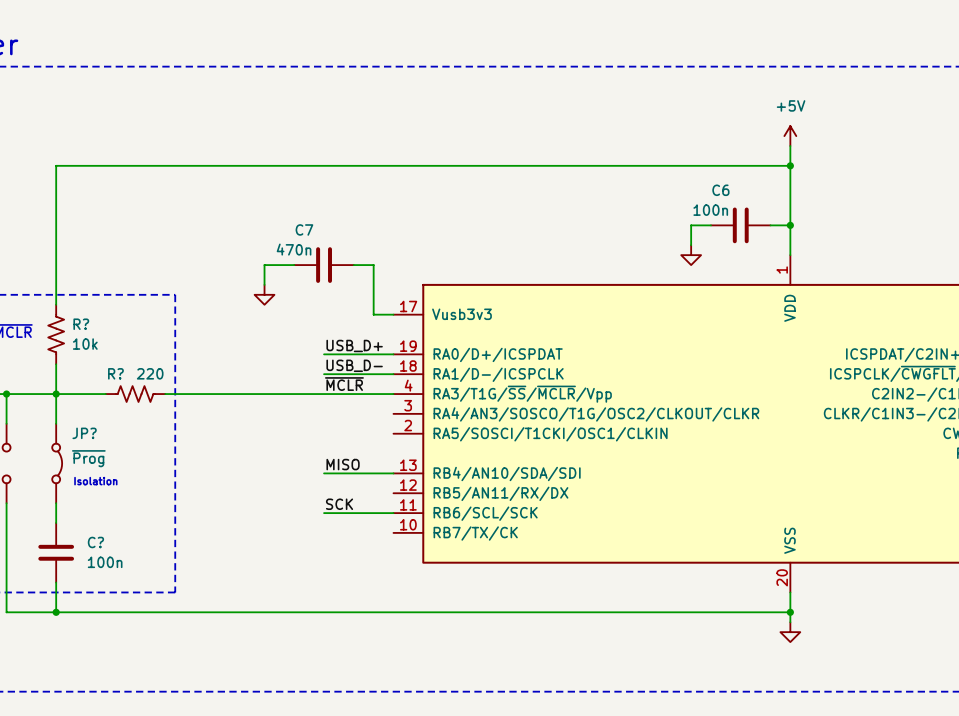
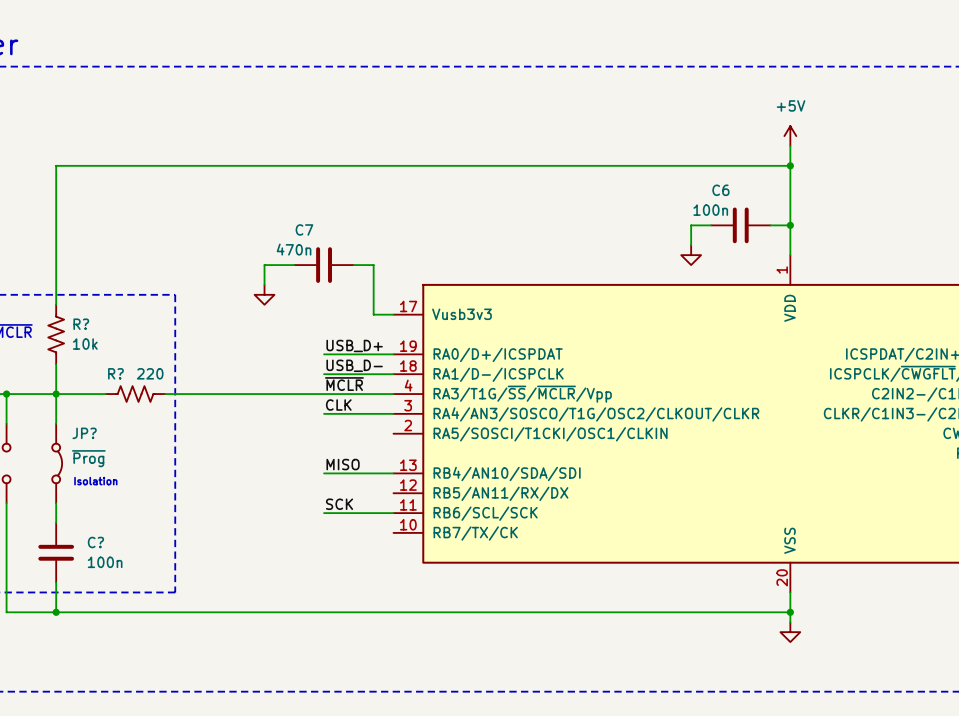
label: none -> CLK (338, 405)
wire: none -> (324, 413) (393, 413)

